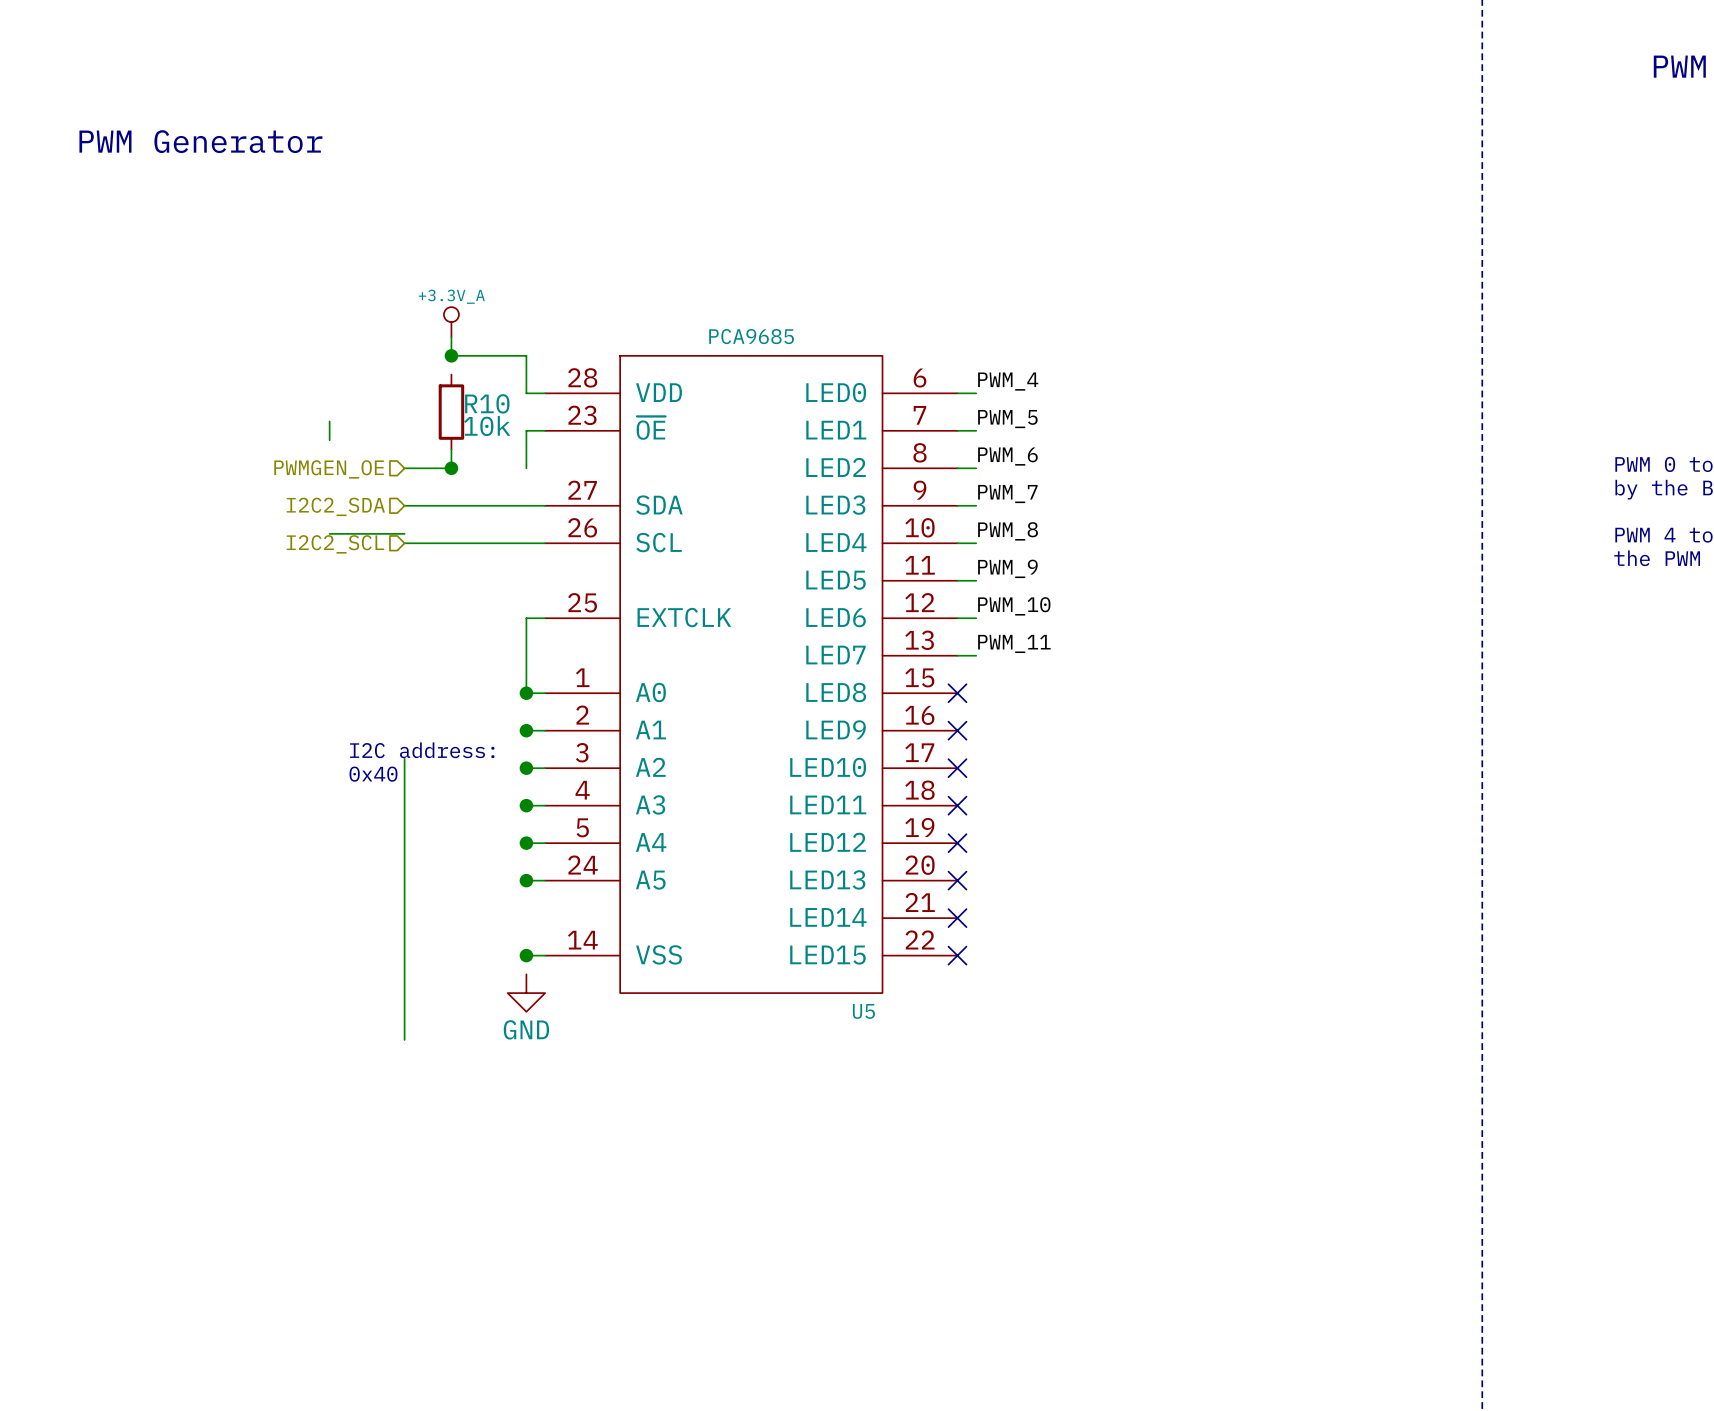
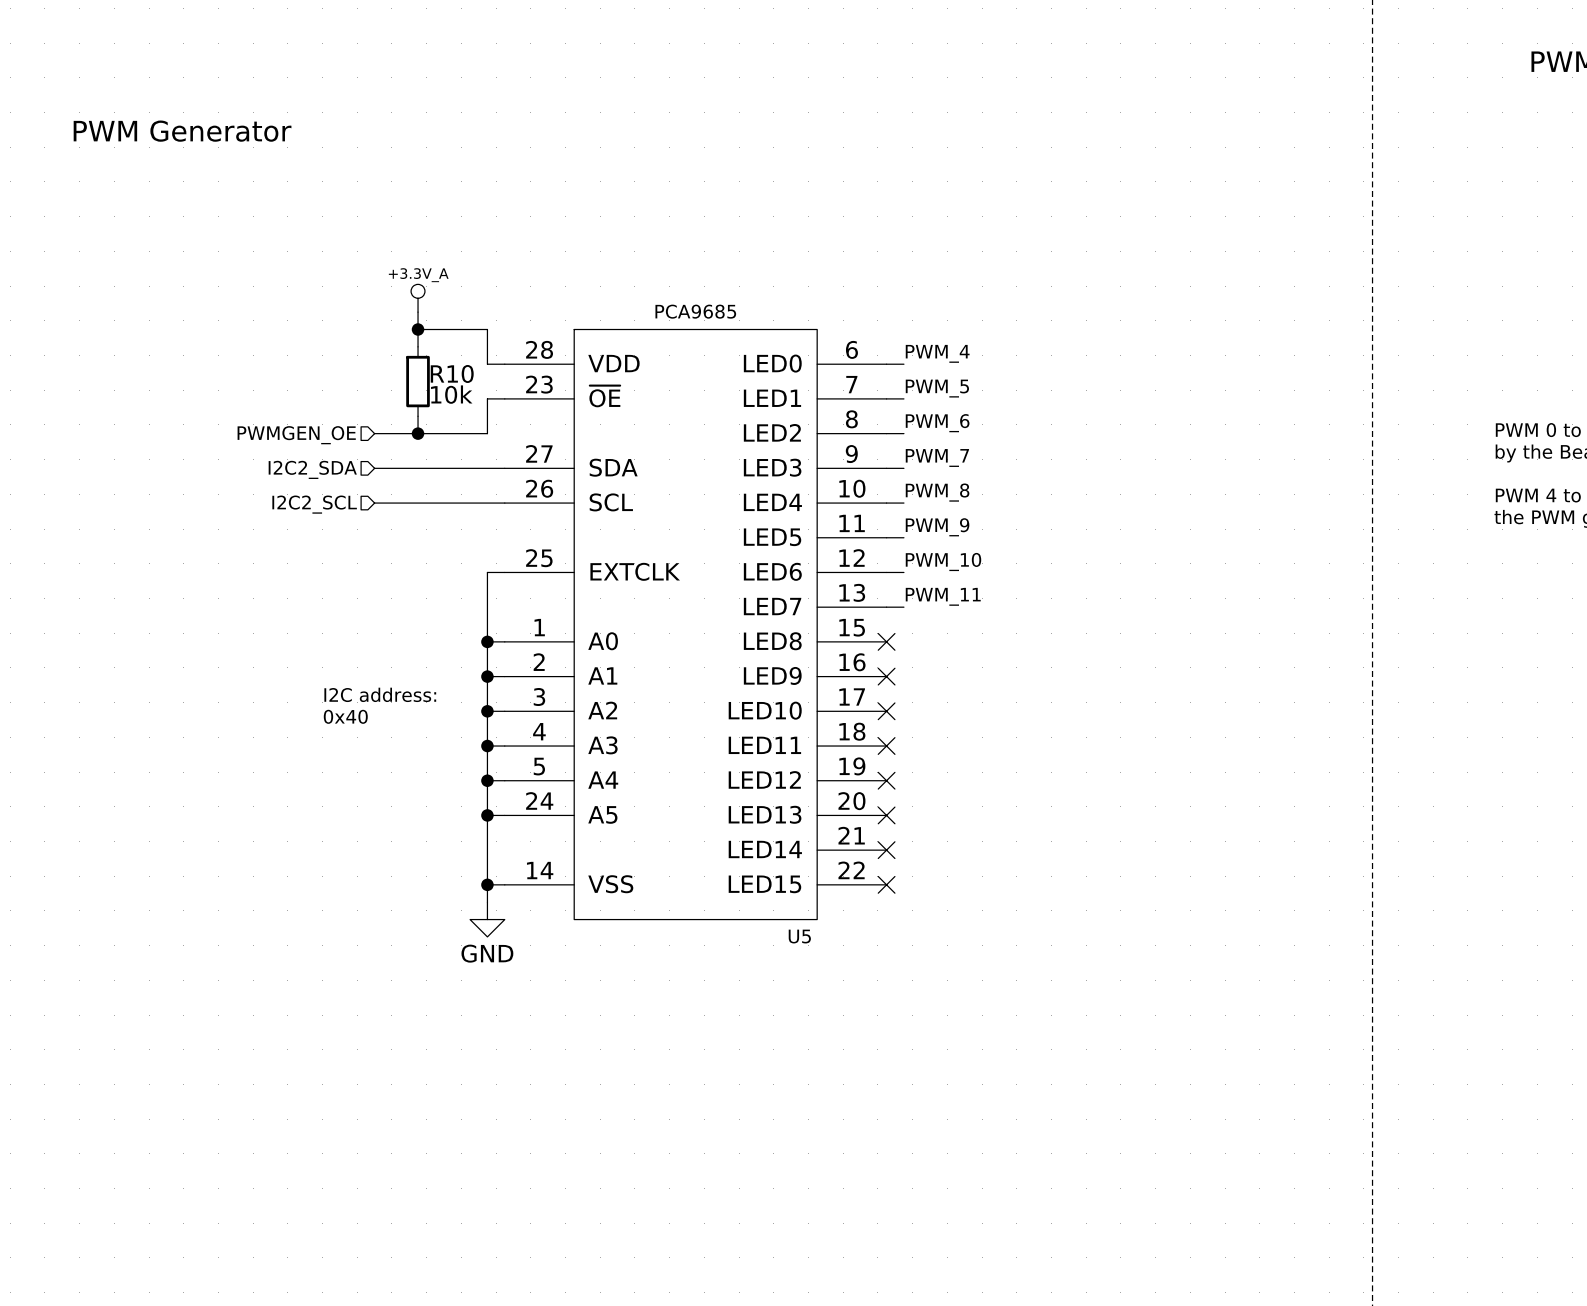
wire: (329, 421) (329, 440) -> (418, 329) (418, 346)
wire: (329, 533) (404, 533) -> (418, 433) (487, 433)
wire: (404, 758) (404, 1039) -> (487, 641) (487, 902)

